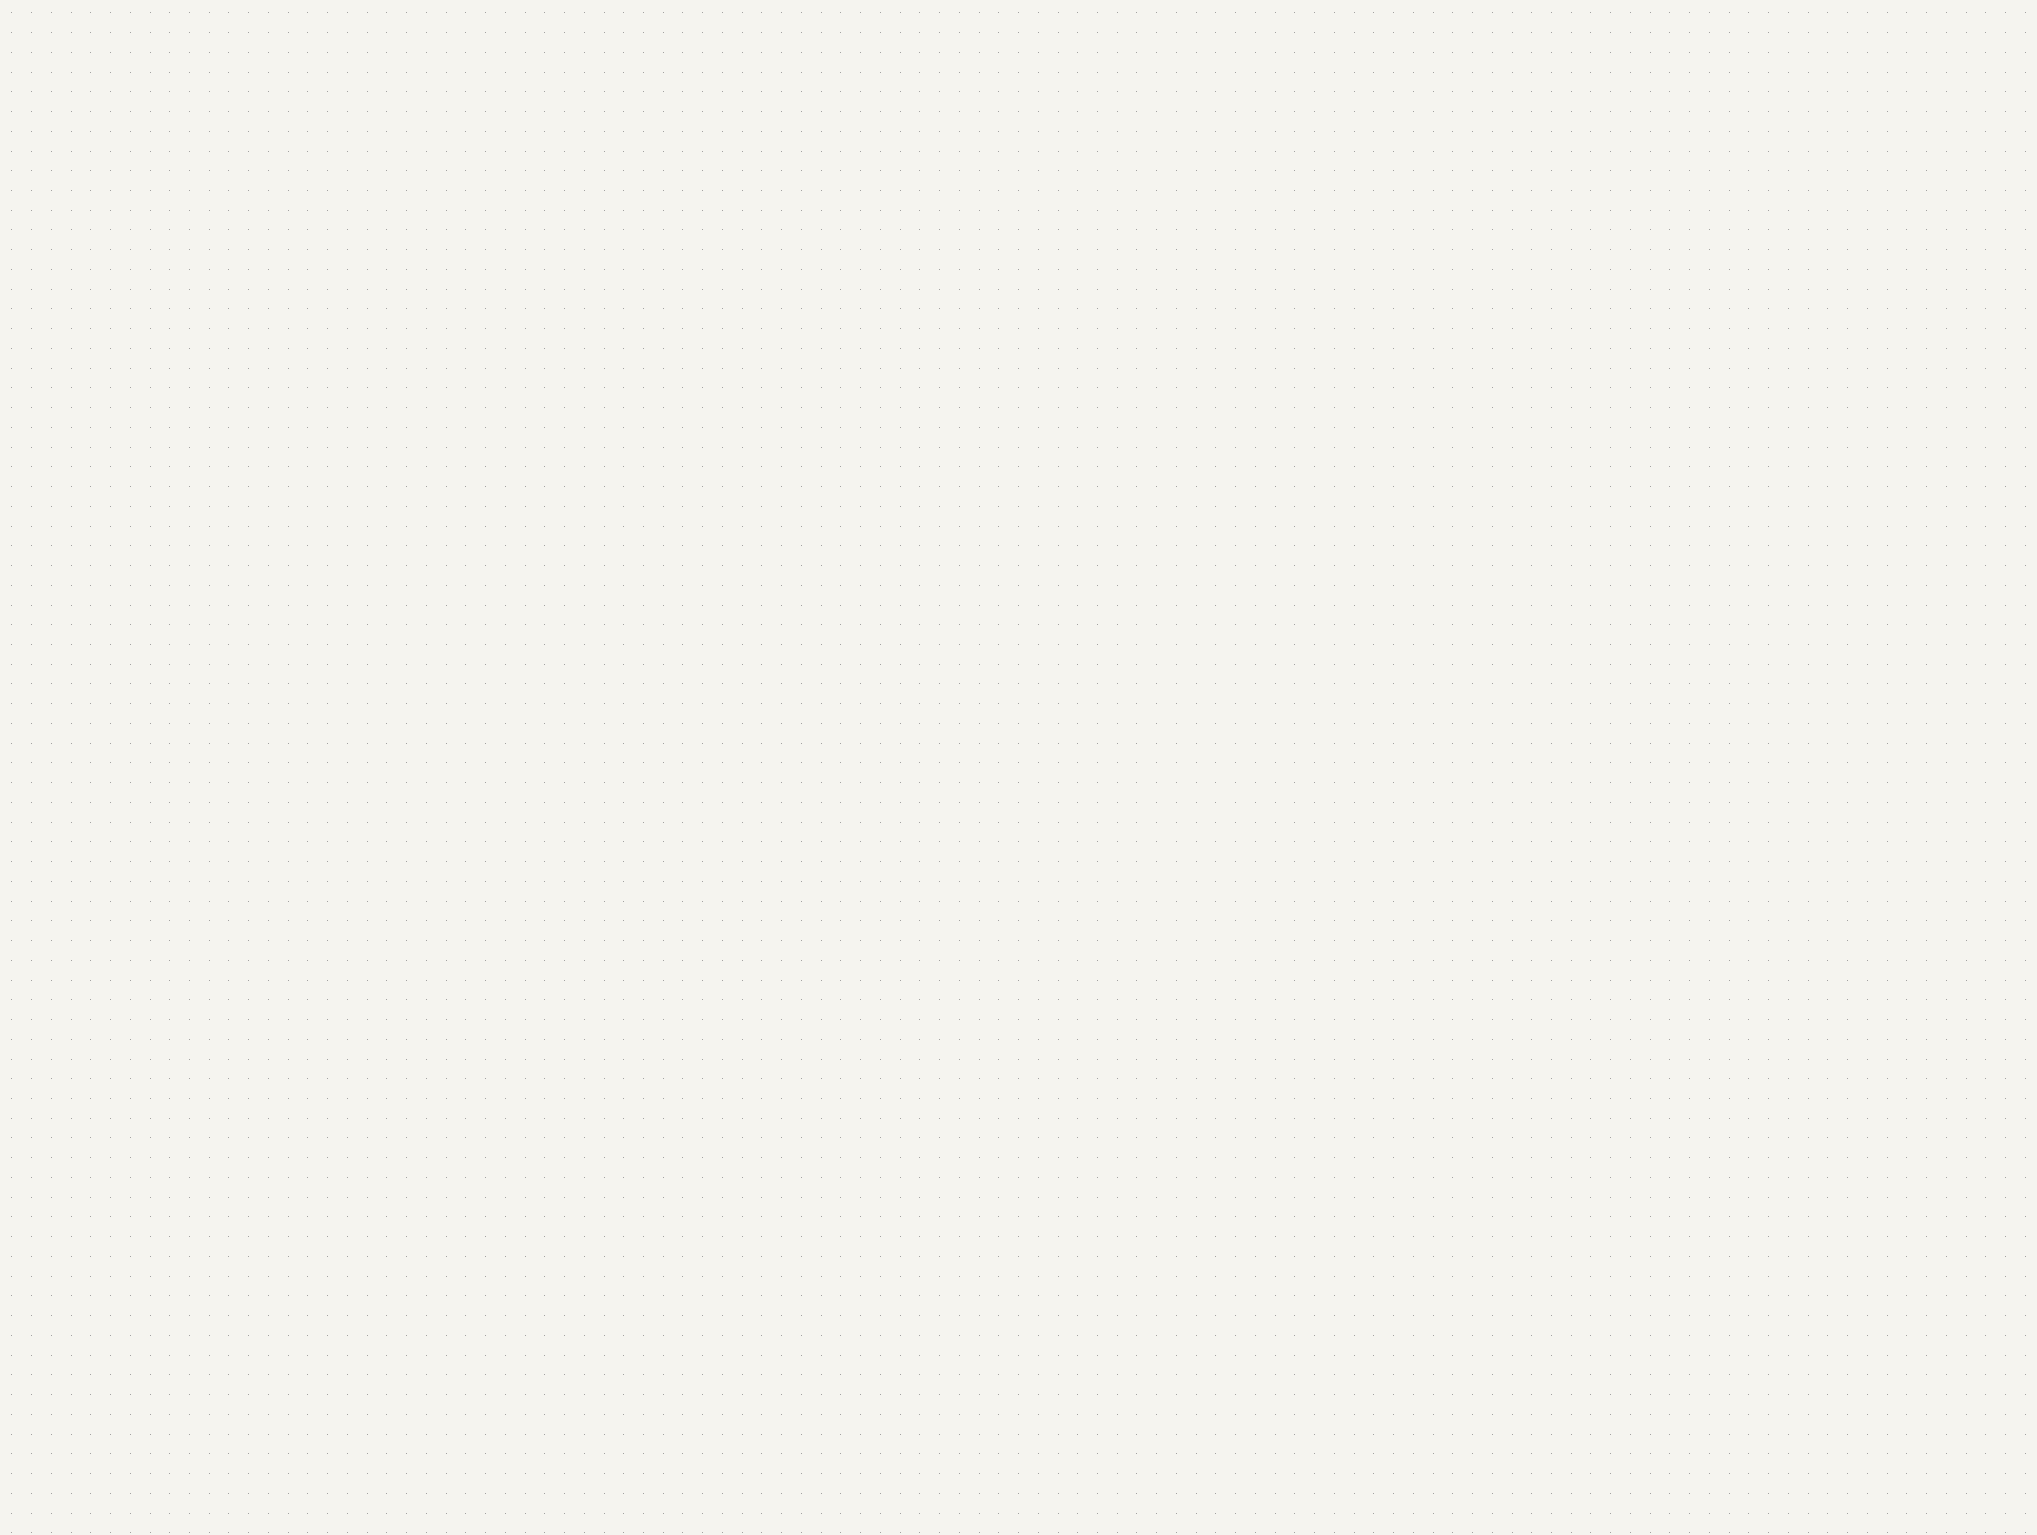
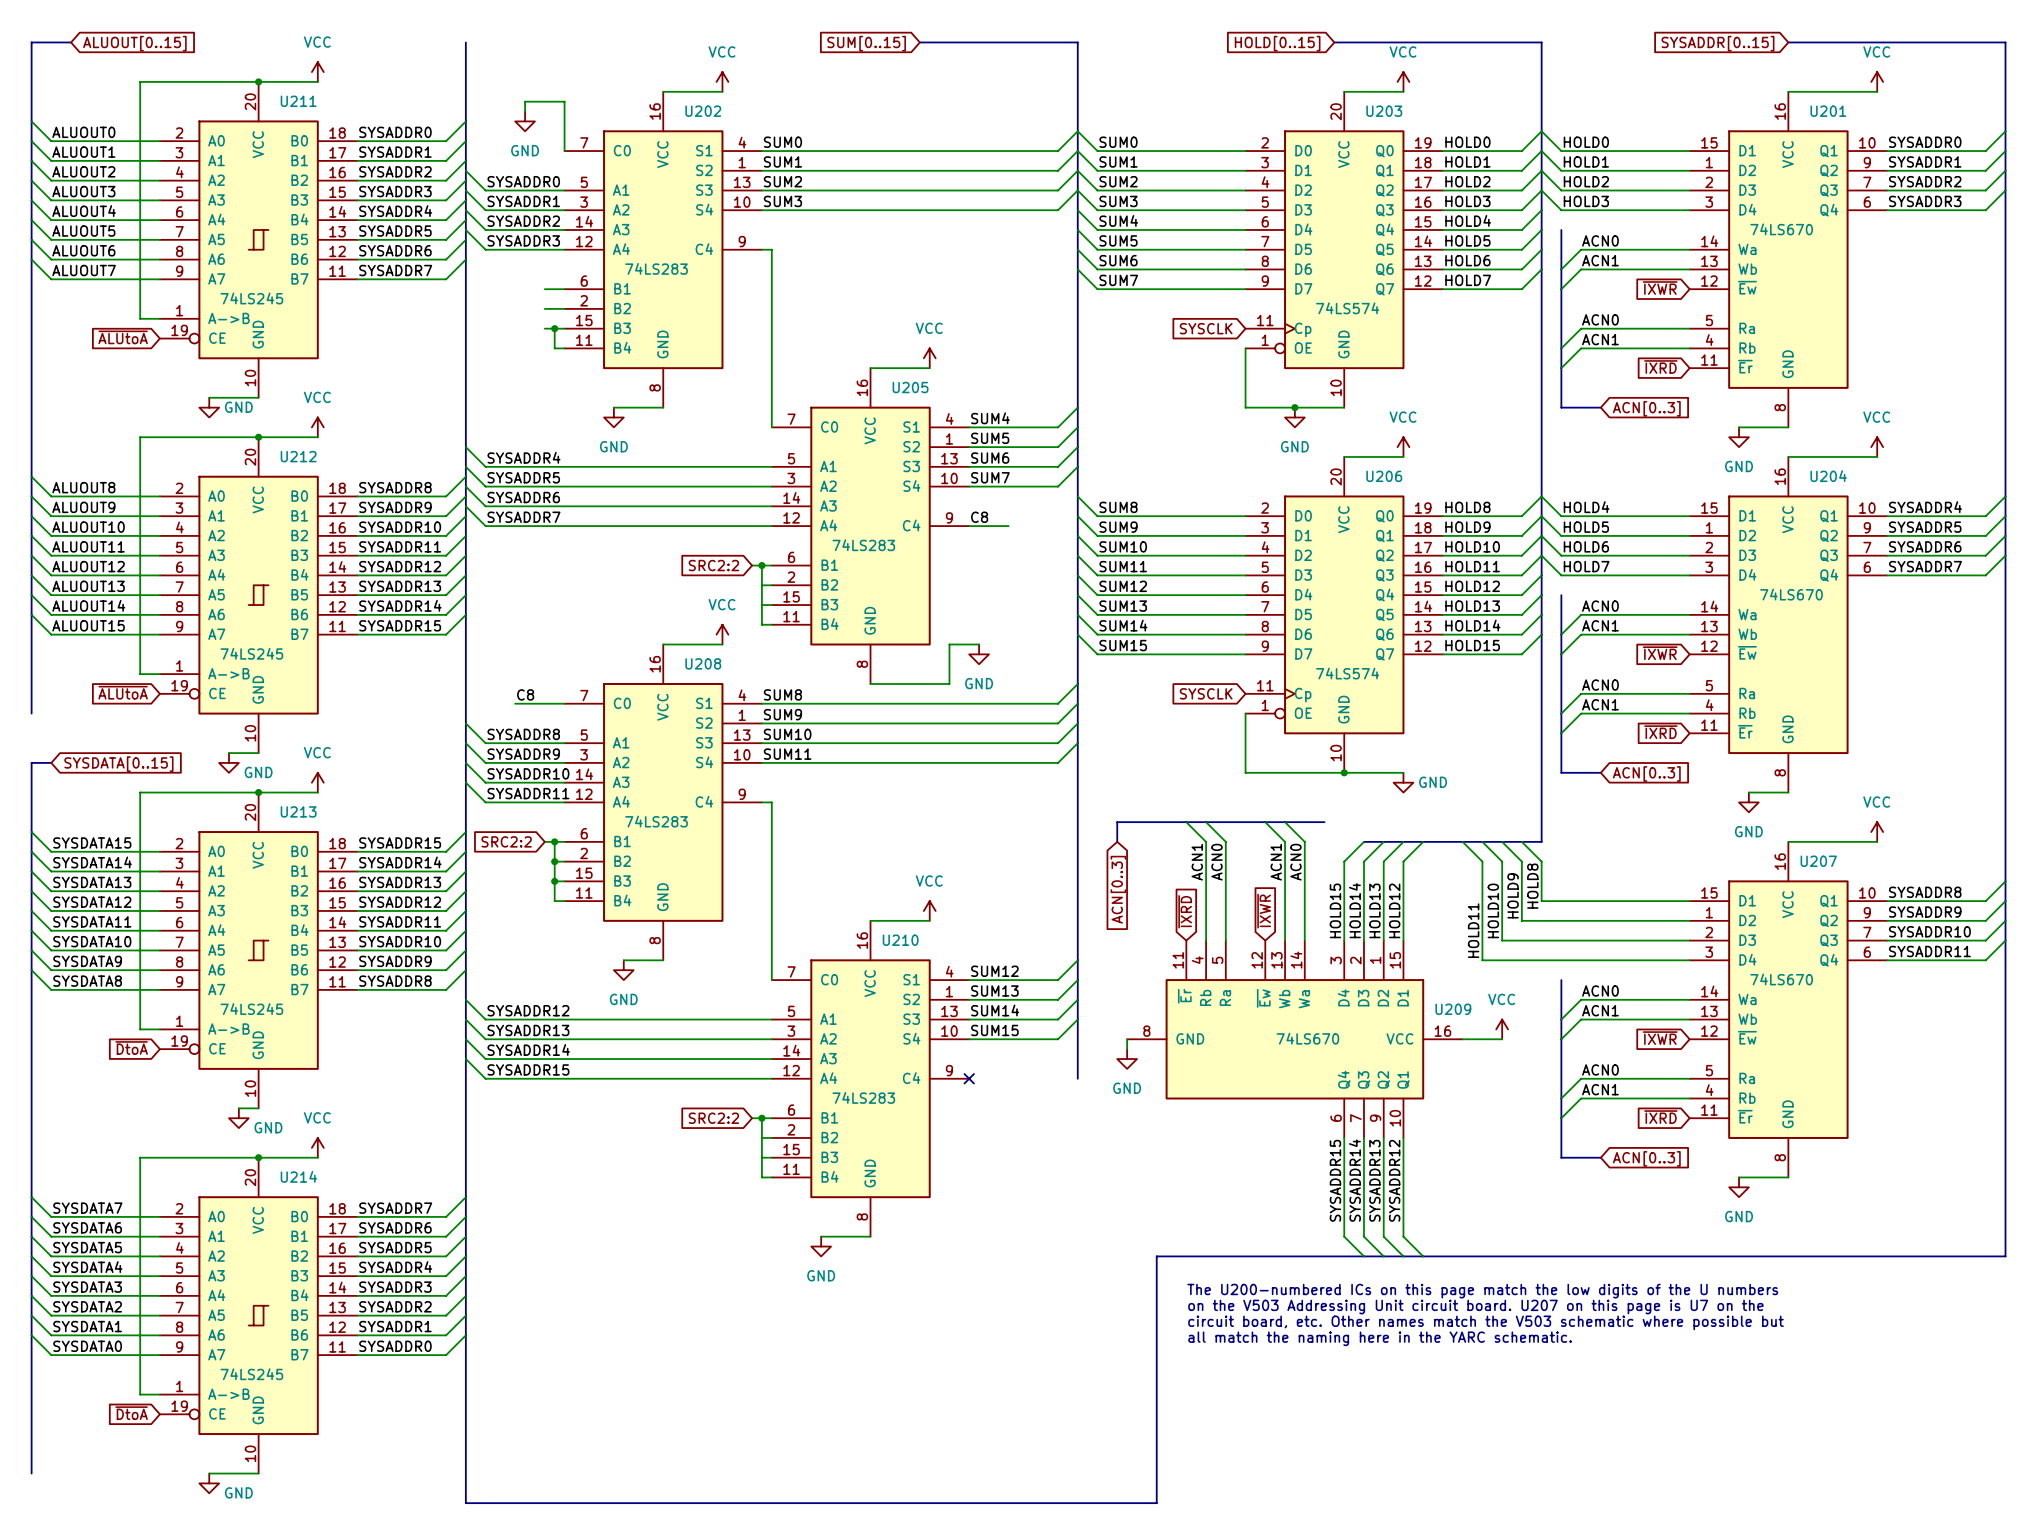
bus: none -> (71, 42) (31, 42) (31, 713)
bus: none -> (465, 42) (465, 1503) (1156, 1503) (1156, 1256) (2005, 1256) (2005, 42) (1788, 42)
bus: none -> (919, 42) (1077, 42) (1077, 1078)
bus: none -> (1334, 42) (1541, 42) (1541, 841) (1363, 841)
global label: none -> ALUOUT[0..15] (134, 43)
global label: none -> SUM[0..15] (866, 43)
global label: none -> HOLD[0..15] (1277, 43)
global label: none -> SYSADDR[0..15] (1717, 43)
power symbol: none -> VCC (317, 72)
junction: none -> (258, 81)
wire: none -> (317, 81) (140, 81) (140, 318) (159, 318)
power symbol: none -> VCC (722, 81)
power symbol: none -> VCC (1403, 81)
power symbol: none -> VCC (1877, 81)
wire: none -> (663, 91) (722, 91)
wire: none -> (1344, 91) (1403, 91)
wire: none -> (1788, 91) (1877, 91)
wire: none -> (525, 111) (525, 101) (564, 101) (564, 151)
wire: none -> (31, 121) (51, 141) (159, 141)
wire: none -> (465, 121) (446, 141) (357, 141)
power symbol: none -> GND (525, 121)
wire: none -> (2005, 131) (1985, 151) (1887, 151)
label: none -> ALUOUT0 (83, 132)
label: none -> SYSADDR0 (395, 132)
wire: none -> (31, 141) (51, 160) (159, 160)
wire: none -> (465, 141) (446, 160) (357, 160)
label: none -> SUM0 (782, 142)
label: none -> SUM0 (1118, 142)
label: none -> HOLD0 (1467, 142)
label: none -> HOLD0 (1586, 142)
label: none -> SYSADDR0 (1925, 142)
wire: none -> (761, 151) (1058, 151) (1077, 131) (1097, 151) (1245, 151)
wire: none -> (1442, 151) (1521, 151) (1541, 131) (1561, 151) (1689, 151)
wire: none -> (2005, 151) (1985, 170) (1887, 170)
label: none -> ALUOUT1 (83, 152)
label: none -> SYSADDR1 (395, 152)
wire: none -> (31, 160) (51, 180) (159, 180)
wire: none -> (465, 160) (446, 180) (357, 180)
label: none -> SUM1 (782, 161)
label: none -> SUM1 (1118, 161)
label: none -> HOLD1 (1467, 161)
label: none -> HOLD1 (1586, 161)
label: none -> SYSADDR1 (1925, 161)
wire: none -> (465, 170) (485, 190) (564, 190)
wire: none -> (761, 170) (1058, 170) (1077, 151) (1097, 170) (1245, 170)
wire: none -> (1442, 170) (1521, 170) (1541, 151) (1561, 170) (1689, 170)
wire: none -> (2005, 170) (1985, 190) (1887, 190)
label: none -> ALUOUT2 (83, 171)
label: none -> SYSADDR2 (395, 171)
wire: none -> (31, 180) (51, 200) (159, 200)
wire: none -> (465, 180) (446, 200) (357, 200)
label: none -> SYSADDR0 (523, 181)
label: none -> SUM2 (782, 181)
label: none -> SUM2 (1118, 181)
label: none -> HOLD2 (1467, 181)
label: none -> HOLD2 (1586, 181)
label: none -> SYSADDR2 (1925, 181)
wire: none -> (465, 190) (485, 210) (564, 210)
wire: none -> (761, 190) (1058, 190) (1077, 170) (1097, 190) (1245, 190)
wire: none -> (1442, 190) (1521, 190) (1541, 170) (1561, 190) (1689, 190)
wire: none -> (2005, 190) (1985, 210) (1887, 210)
label: none -> ALUOUT3 (83, 191)
label: none -> SYSADDR3 (395, 191)
wire: none -> (31, 200) (51, 220) (159, 220)
wire: none -> (465, 200) (446, 220) (357, 220)
label: none -> SYSADDR1 (523, 201)
label: none -> SUM3 (782, 201)
label: none -> SUM3 (1118, 201)
label: none -> HOLD3 (1467, 201)
label: none -> HOLD3 (1586, 201)
label: none -> SYSADDR3 (1925, 201)
wire: none -> (465, 210) (485, 229) (564, 229)
wire: none -> (761, 210) (1058, 210) (1077, 190) (1097, 210) (1245, 210)
wire: none -> (1077, 210) (1097, 229) (1245, 229)
wire: none -> (1442, 210) (1521, 210) (1541, 190) (1561, 210) (1689, 210)
wire: none -> (1541, 210) (1521, 229) (1442, 229)
label: none -> ALUOUT4 (84, 211)
label: none -> SYSADDR4 (395, 211)
wire: none -> (31, 220) (51, 239) (159, 239)
wire: none -> (465, 220) (446, 239) (357, 239)
label: none -> SUM4 (1118, 220)
label: none -> HOLD4 (1468, 220)
label: none -> SYSADDR2 (523, 221)
wire: none -> (465, 229) (485, 249) (564, 249)
wire: none -> (1077, 229) (1097, 249) (1245, 249)
wire: none -> (1541, 229) (1521, 249) (1442, 249)
bus: none -> (1561, 229) (1561, 407) (1600, 407)
label: none -> ALUOUT5 (83, 231)
label: none -> SYSADDR5 (395, 231)
wire: none -> (31, 239) (51, 259) (159, 259)
U211: none -> 74LS245 (258, 239)
wire: none -> (465, 239) (446, 259) (357, 259)
label: none -> SYSADDR3 (523, 240)
label: none -> SUM5 (1118, 240)
label: none -> HOLD5 (1467, 240)
label: none -> ACN0 (1600, 240)
U202: none -> 74LS283 (663, 249)
wire: none -> (761, 249) (771, 249) (771, 427)
wire: none -> (1077, 249) (1097, 269) (1245, 269)
U203: none -> 74LS574 (1344, 249)
wire: none -> (1541, 249) (1521, 269) (1442, 269)
wire: none -> (1689, 249) (1581, 249) (1561, 269)
label: none -> ALUOUT6 (83, 250)
label: none -> SYSADDR6 (395, 250)
wire: none -> (31, 259) (51, 279) (159, 279)
wire: none -> (465, 259) (446, 279) (357, 279)
U201: none -> 74LS670 (1788, 259)
label: none -> SUM6 (1118, 260)
label: none -> HOLD6 (1467, 260)
label: none -> ACN1 (1600, 260)
wire: none -> (1077, 269) (1097, 289) (1245, 289)
wire: none -> (1541, 269) (1521, 289) (1442, 289)
wire: none -> (1689, 269) (1581, 269) (1561, 289)
label: none -> ALUOUT7 (84, 270)
label: none -> SYSADDR7 (395, 270)
label: none -> SUM7 (1118, 280)
label: none -> HOLD7 (1468, 280)
global label: none -> ~{IXWR} (1660, 288)
wire: none -> (544, 289) (564, 289)
wire: none -> (544, 308) (564, 308)
label: none -> ACN0 (1600, 319)
wire: none -> (544, 328) (564, 328)
wire: none -> (554, 328) (554, 348) (564, 348)
junction: none -> (554, 328)
global label: none -> SYSCLK (1206, 328)
wire: none -> (1689, 328) (1581, 328) (1561, 348)
global label: none -> ~{ALUtoA} (123, 337)
label: none -> ACN1 (1600, 339)
wire: none -> (1245, 348) (1245, 407) (1344, 407)
wire: none -> (1689, 348) (1581, 348) (1561, 368)
power symbol: none -> VCC (929, 358)
global label: none -> ~{IXRD} (1660, 367)
wire: none -> (870, 368) (929, 368)
wire: none -> (209, 397) (258, 397)
power symbol: none -> GND (209, 407)
wire: none -> (613, 407) (663, 407)
wire: none -> (1077, 407) (1058, 427) (969, 427)
junction: none -> (1294, 407)
global label: none -> ACN[0..3] (1646, 408)
power symbol: none -> GND (613, 417)
power symbol: none -> GND (1294, 417)
label: none -> SUM4 (990, 418)
power symbol: none -> VCC (317, 427)
wire: none -> (1077, 427) (1058, 447) (969, 447)
wire: none -> (1739, 427) (1788, 427)
junction: none -> (258, 437)
wire: none -> (317, 437) (140, 437) (140, 674) (159, 674)
power symbol: none -> GND (1739, 437)
label: none -> SUM5 (990, 438)
wire: none -> (465, 447) (485, 466) (771, 466)
wire: none -> (1077, 447) (1058, 466) (969, 466)
power symbol: none -> VCC (1403, 447)
power symbol: none -> VCC (1877, 447)
wire: none -> (1344, 456) (1403, 456)
wire: none -> (1788, 456) (1877, 456)
label: none -> SYSADDR4 (523, 457)
label: none -> SUM6 (990, 458)
wire: none -> (465, 466) (485, 486) (771, 486)
wire: none -> (1077, 466) (1058, 486) (969, 486)
wire: none -> (31, 476) (51, 496) (159, 496)
wire: none -> (465, 476) (446, 496) (357, 496)
label: none -> SYSADDR5 (523, 477)
label: none -> SUM7 (990, 477)
wire: none -> (465, 486) (485, 506) (771, 506)
label: none -> ALUOUT8 (83, 487)
label: none -> SYSADDR8 (395, 487)
wire: none -> (31, 496) (51, 516) (159, 516)
wire: none -> (465, 496) (446, 516) (357, 516)
wire: none -> (1077, 496) (1097, 516) (1245, 516)
wire: none -> (2005, 496) (1985, 516) (1887, 516)
label: none -> SYSADDR6 (523, 497)
wire: none -> (465, 506) (485, 526) (771, 526)
label: none -> ALUOUT9 (83, 507)
label: none -> SYSADDR9 (395, 507)
label: none -> SUM8 (1118, 507)
label: none -> HOLD8 (1467, 507)
label: none -> HOLD4 (1586, 507)
label: none -> SYSADDR4 (1925, 507)
wire: none -> (31, 516) (51, 535) (159, 535)
wire: none -> (465, 516) (446, 535) (357, 535)
wire: none -> (1077, 516) (1097, 535) (1245, 535)
wire: none -> (1442, 516) (1521, 516) (1541, 496) (1561, 516) (1689, 516)
wire: none -> (2005, 516) (1985, 535) (1887, 535)
label: none -> SYSADDR7 (523, 517)
label: none -> C8 (979, 517)
U205: none -> 74LS283 (870, 526)
wire: none -> (969, 526) (1008, 526)
label: none -> ALUOUT10 (88, 527)
label: none -> SYSADDR10 (400, 527)
label: none -> SUM9 (1118, 527)
label: none -> HOLD9 (1467, 527)
label: none -> HOLD5 (1586, 527)
label: none -> SYSADDR5 (1925, 527)
wire: none -> (31, 535) (51, 555) (159, 555)
wire: none -> (465, 535) (446, 555) (357, 555)
wire: none -> (1077, 535) (1097, 555) (1245, 555)
wire: none -> (1442, 535) (1521, 535) (1541, 516) (1561, 535) (1689, 535)
wire: none -> (2005, 535) (1985, 555) (1887, 555)
label: none -> ALUOUT11 (88, 546)
label: none -> SYSADDR11 (400, 546)
label: none -> SUM10 (1123, 546)
label: none -> HOLD10 (1472, 546)
label: none -> HOLD6 (1586, 546)
label: none -> SYSADDR6 (1925, 546)
wire: none -> (31, 555) (51, 575) (159, 575)
wire: none -> (465, 555) (446, 575) (357, 575)
wire: none -> (1077, 555) (1097, 575) (1245, 575)
wire: none -> (1442, 555) (1521, 555) (1541, 535) (1561, 555) (1689, 555)
wire: none -> (2005, 555) (1985, 575) (1887, 575)
global label: none -> SRC2:2 (713, 565)
wire: none -> (752, 565) (771, 565)
wire: none -> (761, 565) (761, 624) (771, 624)
junction: none -> (761, 565)
label: none -> ALUOUT12 (88, 566)
label: none -> SYSADDR12 (400, 566)
label: none -> SUM11 (1123, 566)
label: none -> HOLD11 (1472, 566)
label: none -> HOLD7 (1586, 566)
label: none -> SYSADDR7 (1925, 566)
wire: none -> (31, 575) (51, 595) (159, 595)
wire: none -> (465, 575) (446, 595) (357, 595)
wire: none -> (1077, 575) (1097, 595) (1245, 595)
wire: none -> (1442, 575) (1521, 575) (1541, 555) (1561, 575) (1689, 575)
wire: none -> (1541, 575) (1521, 595) (1442, 595)
wire: none -> (761, 585) (771, 585)
label: none -> ALUOUT13 (88, 586)
label: none -> SYSADDR13 (400, 586)
label: none -> SUM12 (1123, 586)
label: none -> HOLD12 (1472, 586)
wire: none -> (31, 595) (51, 614) (159, 614)
U212: none -> 74LS245 (258, 595)
wire: none -> (465, 595) (446, 614) (357, 614)
wire: none -> (1077, 595) (1097, 614) (1245, 614)
wire: none -> (1541, 595) (1521, 614) (1442, 614)
bus: none -> (1561, 595) (1561, 772) (1600, 772)
label: none -> ALUOUT14 (88, 605)
label: none -> SYSADDR14 (400, 605)
wire: none -> (761, 605) (771, 605)
label: none -> SUM13 (1123, 606)
label: none -> HOLD13 (1472, 606)
label: none -> ACN0 (1600, 606)
wire: none -> (31, 614) (51, 634) (159, 634)
wire: none -> (465, 614) (446, 634) (357, 634)
wire: none -> (1077, 614) (1097, 634) (1245, 634)
U206: none -> 74LS574 (1344, 614)
wire: none -> (1541, 614) (1521, 634) (1442, 634)
wire: none -> (1689, 614) (1581, 614) (1561, 634)
U204: none -> 74LS670 (1788, 624)
label: none -> ALUOUT15 (88, 625)
label: none -> SYSADDR15 (400, 625)
label: none -> SUM14 (1123, 625)
label: none -> HOLD14 (1472, 625)
label: none -> ACN1 (1600, 625)
power symbol: none -> VCC (722, 634)
wire: none -> (1077, 634) (1097, 654) (1245, 654)
wire: none -> (1541, 634) (1521, 654) (1442, 654)
wire: none -> (1689, 634) (1581, 634) (1561, 654)
wire: none -> (663, 644) (722, 644)
wire: none -> (979, 644) (949, 644) (949, 683) (870, 683)
label: none -> SUM15 (1123, 645)
label: none -> HOLD15 (1472, 645)
global label: none -> ~{IXWR} (1660, 653)
power symbol: none -> GND (979, 654)
wire: none -> (1077, 683) (1058, 703) (761, 703)
label: none -> ACN0 (1600, 685)
global label: none -> ~{ALUtoA} (123, 692)
global label: none -> SYSCLK (1206, 693)
wire: none -> (1689, 693) (1581, 693) (1561, 713)
label: none -> C8 (525, 694)
label: none -> SUM8 (782, 694)
wire: none -> (515, 703) (564, 703)
wire: none -> (1077, 703) (1058, 723) (761, 723)
label: none -> ACN1 (1600, 704)
wire: none -> (1245, 713) (1245, 772) (1403, 772)
wire: none -> (1689, 713) (1581, 713) (1561, 733)
label: none -> SUM9 (782, 714)
wire: none -> (465, 723) (485, 743) (564, 743)
wire: none -> (1077, 723) (1058, 743) (761, 743)
global label: none -> ~{IXRD} (1660, 732)
label: none -> SYSADDR8 (523, 734)
label: none -> SUM10 (787, 734)
wire: none -> (465, 743) (485, 762) (564, 762)
wire: none -> (1077, 743) (1058, 762) (761, 762)
wire: none -> (228, 753) (258, 753)
label: none -> SYSADDR9 (523, 754)
label: none -> SUM11 (787, 754)
bus: none -> (51, 762) (31, 762) (31, 1473)
power symbol: none -> GND (228, 762)
wire: none -> (465, 762) (485, 782) (564, 782)
global label: none -> SYSDATA[0..15] (118, 764)
junction: none -> (1344, 772)
label: none -> SYSADDR10 (528, 773)
global label: none -> ACN[0..3] (1646, 773)
power symbol: none -> VCC (317, 782)
wire: none -> (465, 782) (485, 802) (564, 802)
power symbol: none -> GND (1403, 782)
junction: none -> (258, 792)
wire: none -> (317, 792) (140, 792) (140, 1029) (159, 1029)
wire: none -> (1748, 792) (1788, 792)
label: none -> SYSADDR11 (528, 793)
U208: none -> 74LS283 (663, 802)
wire: none -> (761, 802) (771, 802) (771, 980)
power symbol: none -> GND (1748, 802)
wire: none -> (1186, 822) (1206, 841) (1206, 940)
wire: none -> (1206, 822) (1225, 841) (1225, 940)
wire: none -> (1265, 822) (1285, 841) (1285, 940)
wire: none -> (1285, 822) (1304, 841) (1304, 940)
bus: none -> (1324, 822) (1117, 822) (1117, 841)
wire: none -> (31, 832) (51, 851) (159, 851)
wire: none -> (465, 832) (446, 851) (357, 851)
power symbol: none -> VCC (1877, 832)
global label: none -> SRC2:2 (506, 841)
wire: none -> (544, 841) (564, 841)
wire: none -> (554, 841) (554, 901) (564, 901)
junction: none -> (554, 841)
wire: none -> (1363, 841) (1344, 861) (1344, 940)
wire: none -> (1383, 841) (1363, 861) (1363, 940)
wire: none -> (1403, 841) (1383, 861) (1383, 940)
wire: none -> (1423, 841) (1403, 861) (1403, 940)
wire: none -> (1462, 841) (1482, 861) (1482, 960) (1689, 960)
wire: none -> (1482, 841) (1502, 861) (1502, 940) (1689, 940)
wire: none -> (1502, 841) (1521, 861) (1521, 920) (1689, 920)
wire: none -> (1521, 841) (1541, 861) (1541, 901) (1689, 901)
wire: none -> (1788, 841) (1877, 841)
label: none -> SYSDATA15 (92, 842)
label: none -> SYSADDR15 (400, 842)
wire: none -> (31, 851) (51, 871) (159, 871)
wire: none -> (465, 851) (446, 871) (357, 871)
wire: none -> (554, 861) (564, 861)
junction: none -> (554, 861)
label: none -> SYSDATA14 (92, 862)
label: none -> SYSADDR14 (400, 862)
label: none -> ACN1 (1197, 862)
label: none -> ACN0 (1217, 862)
label: none -> ACN1 (1276, 862)
label: none -> ACN0 (1295, 862)
wire: none -> (31, 871) (51, 891) (159, 891)
wire: none -> (465, 871) (446, 891) (357, 891)
wire: none -> (554, 881) (564, 881)
junction: none -> (554, 881)
wire: none -> (2005, 881) (1985, 901) (1887, 901)
label: none -> SYSDATA13 (92, 882)
label: none -> SYSADDR13 (400, 882)
label: none -> HOLD8 (1532, 886)
global label: none -> ACN[0..3] (1118, 889)
wire: none -> (31, 891) (51, 910) (159, 910)
wire: none -> (465, 891) (446, 910) (357, 910)
label: none -> SYSADDR8 (1925, 892)
label: none -> HOLD9 (1513, 895)
wire: none -> (2005, 901) (1985, 920) (1887, 920)
label: none -> SYSDATA12 (92, 902)
label: none -> SYSADDR12 (400, 902)
wire: none -> (31, 910) (51, 930) (159, 930)
wire: none -> (465, 910) (446, 930) (357, 930)
power symbol: none -> VCC (929, 910)
label: none -> HOLD15 (1335, 910)
label: none -> HOLD14 (1354, 910)
label: none -> HOLD13 (1374, 910)
label: none -> HOLD12 (1394, 910)
label: none -> HOLD10 (1493, 910)
global label: none -> ~{IXRD} (1185, 911)
global label: none -> ~{IXWR} (1264, 911)
label: none -> SYSADDR9 (1925, 912)
wire: none -> (870, 920) (929, 920)
wire: none -> (2005, 920) (1985, 940) (1887, 940)
label: none -> SYSDATA11 (92, 921)
label: none -> SYSADDR11 (400, 921)
wire: none -> (31, 930) (51, 950) (159, 950)
wire: none -> (465, 930) (446, 950) (357, 950)
label: none -> HOLD11 (1473, 930)
label: none -> SYSADDR10 (1929, 931)
wire: none -> (2005, 940) (1985, 960) (1887, 960)
label: none -> SYSDATA10 (92, 941)
label: none -> SYSADDR10 (400, 941)
wire: none -> (31, 950) (51, 970) (159, 970)
U213: none -> 74LS245 (258, 950)
wire: none -> (465, 950) (446, 970) (357, 970)
label: none -> SYSADDR11 (1929, 951)
wire: none -> (623, 960) (663, 960)
wire: none -> (1077, 960) (1058, 980) (969, 980)
label: none -> SYSDATA9 (87, 961)
label: none -> SYSADDR9 (395, 961)
wire: none -> (31, 970) (51, 989) (159, 989)
wire: none -> (465, 970) (446, 989) (357, 989)
power symbol: none -> GND (623, 970)
label: none -> SUM12 (994, 971)
wire: none -> (1077, 980) (1058, 999) (969, 999)
bus: none -> (1561, 980) (1561, 1157) (1600, 1157)
label: none -> SYSDATA8 (87, 981)
label: none -> SYSADDR8 (395, 981)
label: none -> SUM13 (994, 990)
label: none -> ACN0 (1600, 990)
wire: none -> (465, 999) (485, 1019) (771, 1019)
wire: none -> (1077, 999) (1058, 1019) (969, 1019)
wire: none -> (1689, 999) (1581, 999) (1561, 1019)
U207: none -> 74LS670 (1788, 1009)
label: none -> SYSADDR12 (528, 1010)
label: none -> SUM14 (995, 1010)
label: none -> ACN1 (1600, 1010)
wire: none -> (465, 1019) (485, 1039) (771, 1039)
wire: none -> (1077, 1019) (1058, 1039) (969, 1039)
wire: none -> (1689, 1019) (1581, 1019) (1561, 1039)
power symbol: none -> VCC (1502, 1029)
label: none -> SYSADDR13 (528, 1030)
label: none -> SUM15 (994, 1030)
global label: none -> ~{IXWR} (1660, 1038)
wire: none -> (465, 1039) (485, 1059) (771, 1059)
wire: none -> (1127, 1039) (1127, 1049)
U209: none -> 74LS670 (1294, 1039)
wire: none -> (1462, 1039) (1502, 1039)
global label: none -> ~{DtoA} (131, 1048)
label: none -> SYSADDR14 (528, 1049)
wire: none -> (465, 1059) (485, 1078) (771, 1078)
power symbol: none -> GND (1127, 1059)
label: none -> SYSADDR15 (528, 1069)
label: none -> ACN0 (1600, 1069)
U210: none -> 74LS283 (870, 1078)
no-connect mark: none -> (969, 1078)
wire: none -> (1689, 1078) (1581, 1078) (1561, 1098)
label: none -> ACN1 (1600, 1089)
wire: none -> (1689, 1098) (1581, 1098) (1561, 1118)
wire: none -> (238, 1108) (258, 1108)
global label: none -> ~{IXRD} (1660, 1117)
power symbol: none -> GND (238, 1118)
global label: none -> SRC2:2 (713, 1118)
wire: none -> (752, 1118) (771, 1118)
wire: none -> (761, 1118) (761, 1177) (771, 1177)
junction: none -> (761, 1118)
wire: none -> (761, 1137) (771, 1137)
wire: none -> (1344, 1137) (1344, 1236) (1363, 1256)
wire: none -> (1363, 1137) (1363, 1236) (1383, 1256)
wire: none -> (1383, 1137) (1383, 1236) (1403, 1256)
wire: none -> (1403, 1137) (1403, 1236) (1423, 1256)
power symbol: none -> VCC (317, 1147)
junction: none -> (258, 1157)
wire: none -> (317, 1157) (140, 1157) (140, 1394) (159, 1394)
wire: none -> (761, 1157) (771, 1157)
global label: none -> ACN[0..3] (1646, 1158)
wire: none -> (1739, 1177) (1788, 1177)
label: none -> SYSADDR15 (1335, 1180)
label: none -> SYSADDR14 (1354, 1180)
label: none -> SYSADDR13 (1374, 1180)
label: none -> SYSADDR12 (1394, 1180)
power symbol: none -> GND (1739, 1187)
wire: none -> (31, 1197) (51, 1216) (159, 1216)
wire: none -> (465, 1197) (446, 1216) (357, 1216)
label: none -> SYSDATA7 (87, 1208)
label: none -> SYSADDR7 (395, 1208)
wire: none -> (31, 1216) (51, 1236) (159, 1236)
wire: none -> (465, 1216) (446, 1236) (357, 1236)
label: none -> SYSDATA6 (87, 1227)
label: none -> SYSADDR6 (395, 1227)
wire: none -> (31, 1236) (51, 1256) (159, 1256)
wire: none -> (465, 1236) (446, 1256) (357, 1256)
wire: none -> (821, 1236) (870, 1236)
power symbol: none -> GND (821, 1246)
label: none -> SYSDATA5 (87, 1247)
label: none -> SYSADDR5 (395, 1247)
wire: none -> (31, 1256) (51, 1276) (159, 1276)
wire: none -> (465, 1256) (446, 1276) (357, 1276)
label: none -> SYSDATA4 (87, 1267)
label: none -> SYSADDR4 (395, 1267)
wire: none -> (31, 1276) (51, 1295) (159, 1295)
wire: none -> (465, 1276) (446, 1295) (357, 1295)
label: none -> SYSDATA3 (87, 1287)
label: none -> SYSADDR3 (395, 1287)
text: none -> The U200-numbered ICs on this page match the low digits of the U numbers (1482, 1291)
wire: none -> (31, 1295) (51, 1315) (159, 1315)
wire: none -> (465, 1295) (446, 1315) (357, 1315)
label: none -> SYSDATA2 (87, 1306)
label: none -> SYSADDR2 (395, 1306)
text: none -> on the V503 Addressing Unit circuit board. U207 on this page is U7 on the (1475, 1307)
wire: none -> (31, 1315) (51, 1335) (159, 1335)
U214: none -> 74LS245 (258, 1315)
wire: none -> (465, 1315) (446, 1335) (357, 1335)
text: none -> circuit board, etc. Other names match the V503 schematic where possible but (1486, 1322)
label: none -> SYSDATA1 (87, 1326)
label: none -> SYSADDR1 (395, 1326)
wire: none -> (31, 1335) (51, 1355) (159, 1355)
wire: none -> (465, 1335) (446, 1355) (357, 1355)
text: none -> all match the naming here in the YARC schematic. (1380, 1338)
label: none -> SYSDATA0 (87, 1346)
label: none -> SYSADDR0 (395, 1346)
global label: none -> ~{DtoA} (131, 1413)
wire: none -> (209, 1473) (258, 1473)
power symbol: none -> GND (209, 1483)

